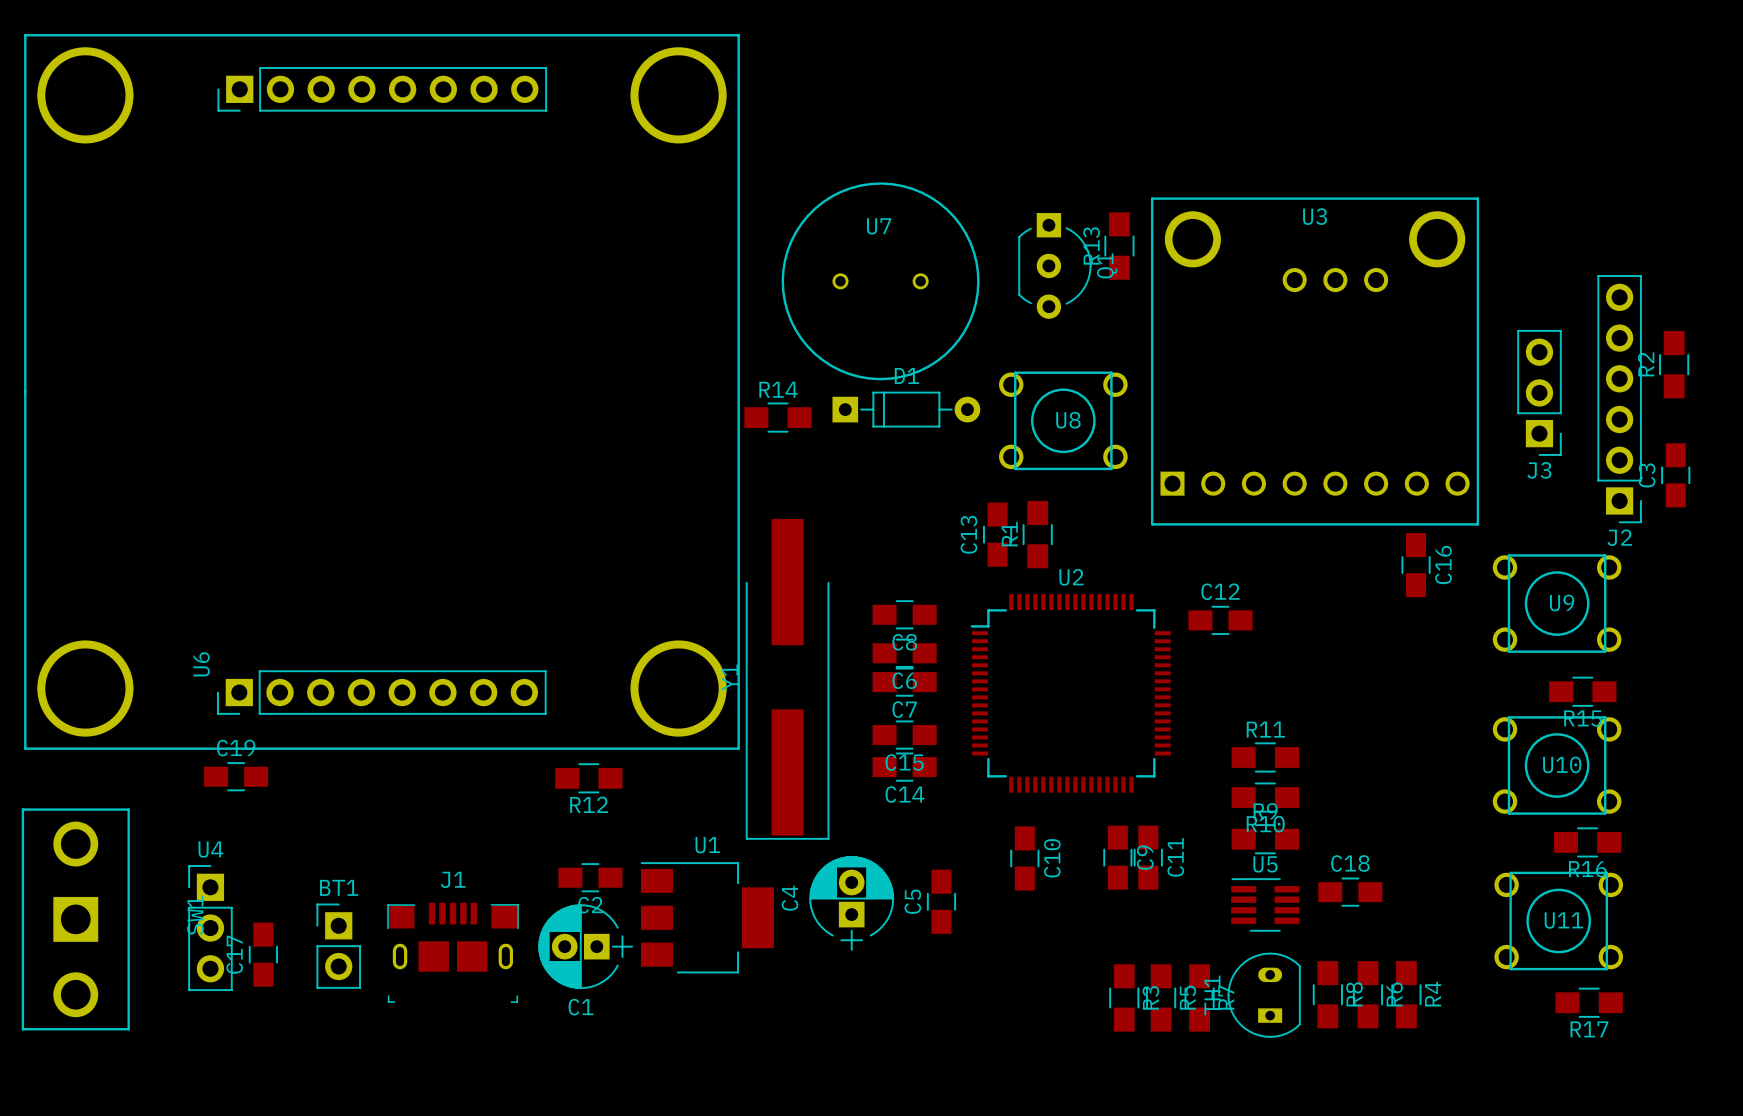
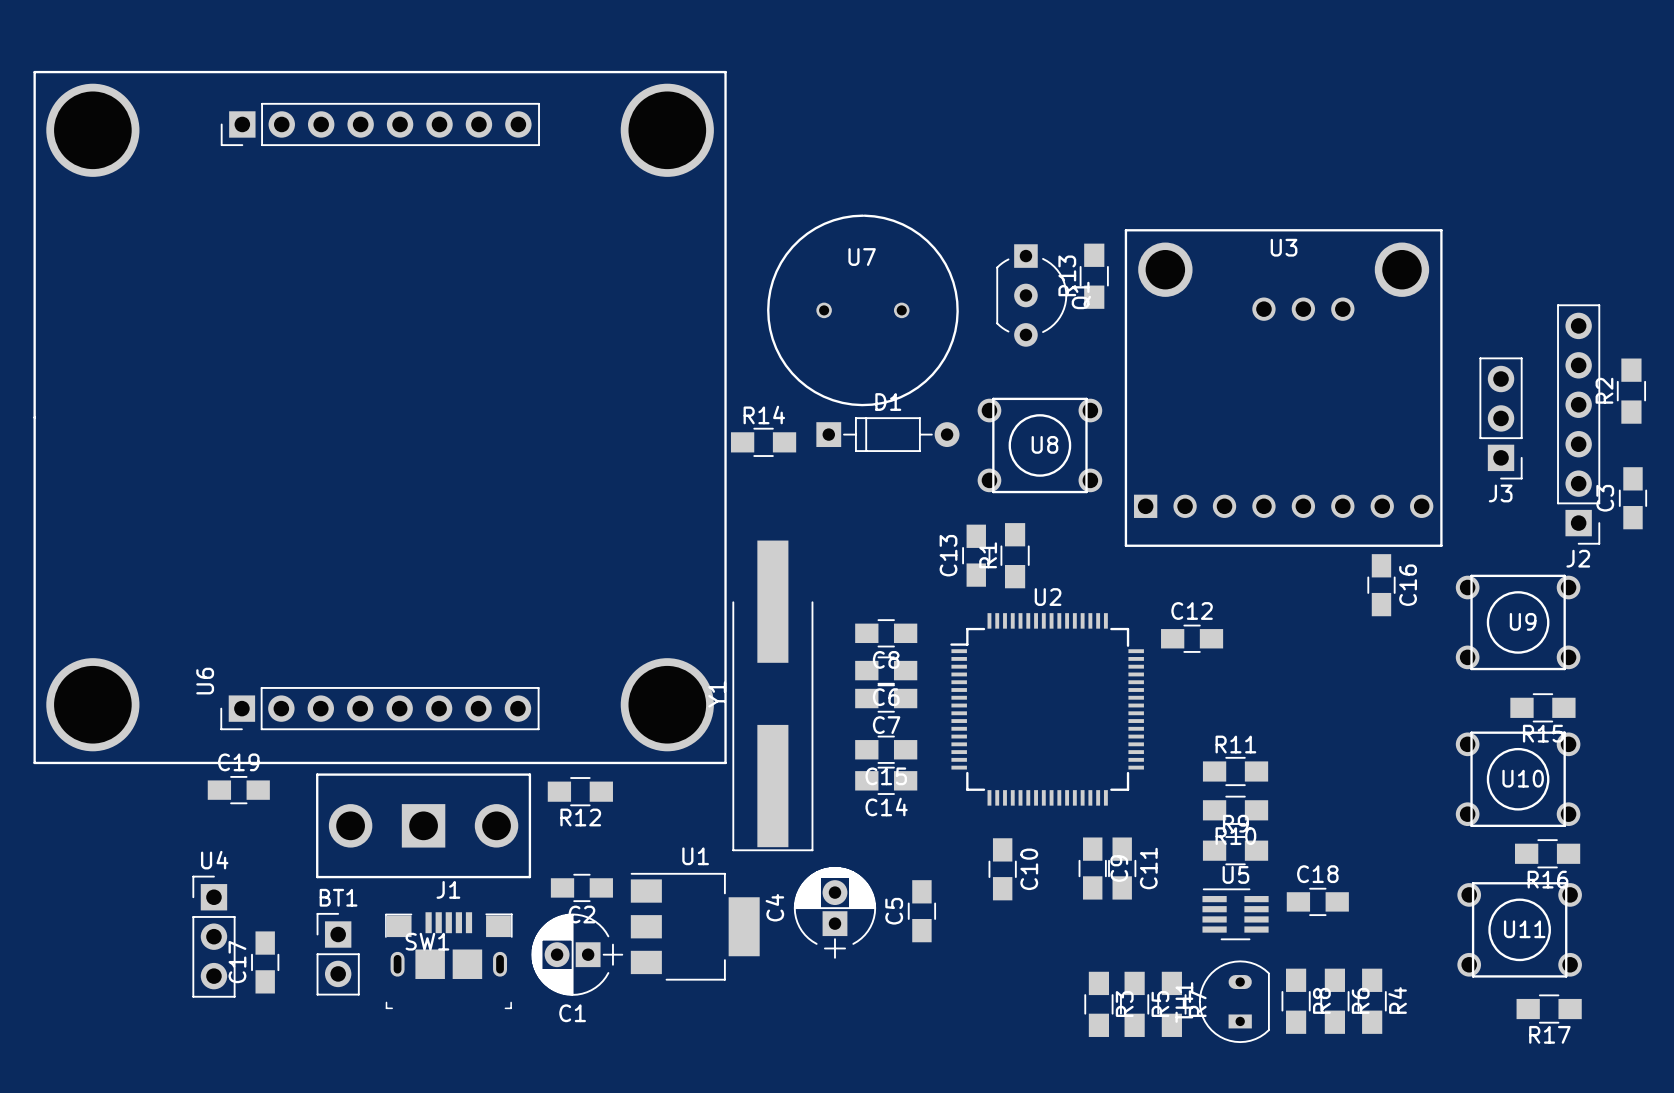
SW1 rotation: 0° (75, 919) -> 90° clockwise (423, 825)
SW1 position: (75, 919) -> (423, 825)

